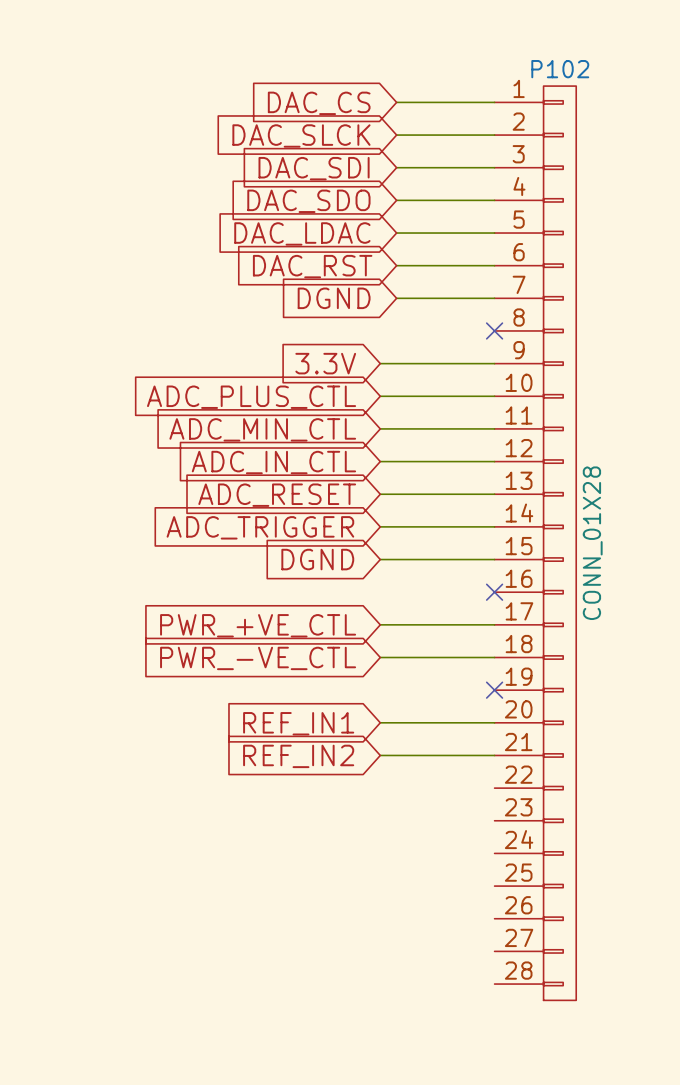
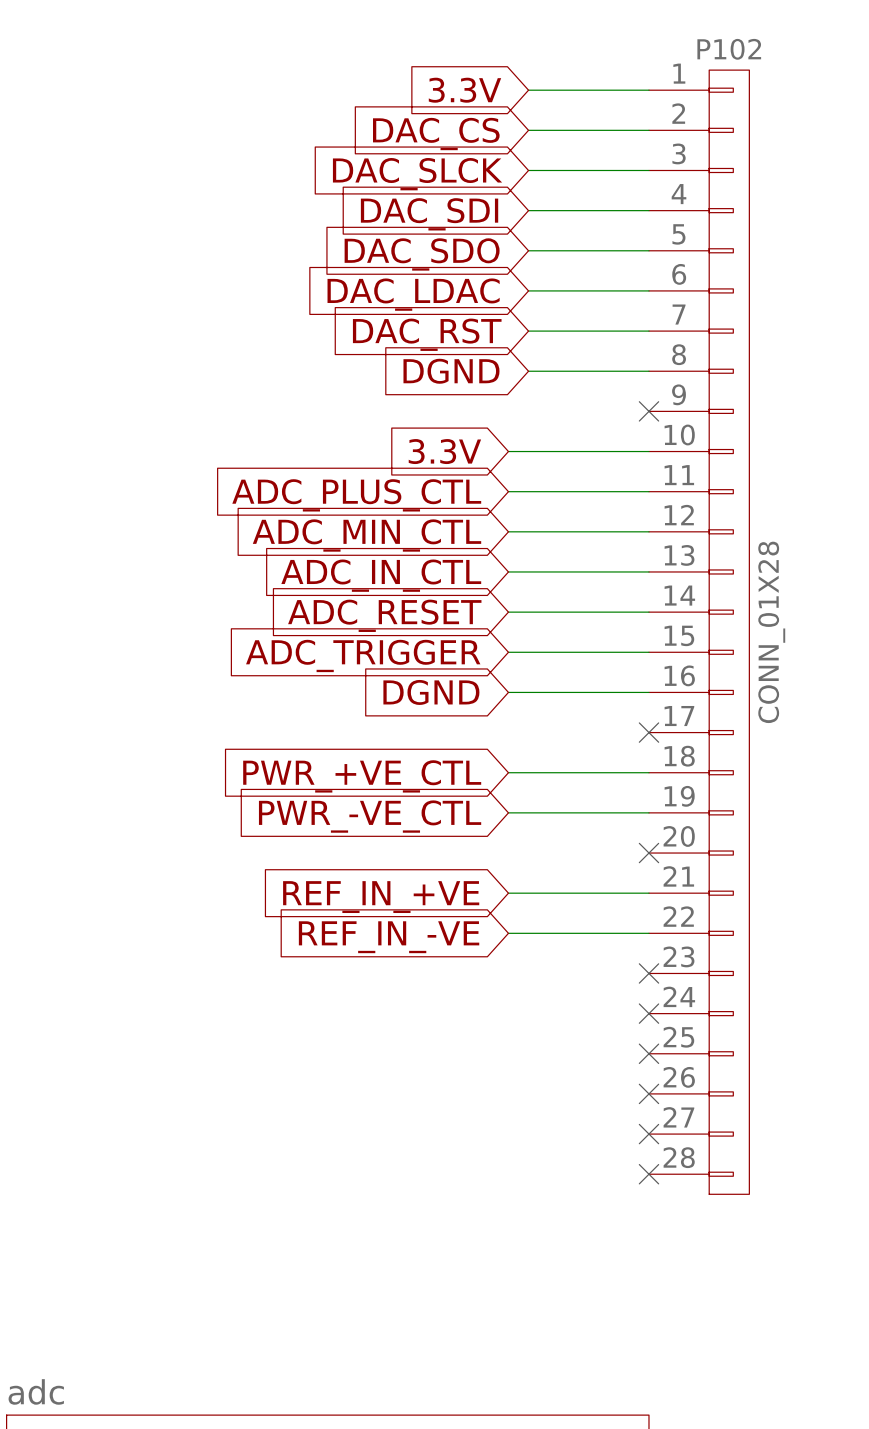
global label: none -> 3.3V (464, 90)
wire: none -> (528, 90) (648, 90)
P102 position: (535, 543) -> (699, 632)
global label: REF_IN1 (298, 723) -> REF_IN_+VE (381, 897)
global label: REF_IN2 (298, 756) -> REF_IN_-VE (389, 937)
no-connect mark: none -> (648, 973)
no-connect mark: none -> (648, 1013)
no-connect mark: none -> (648, 1053)
no-connect mark: none -> (648, 1093)
no-connect mark: none -> (648, 1134)
no-connect mark: none -> (648, 1174)

